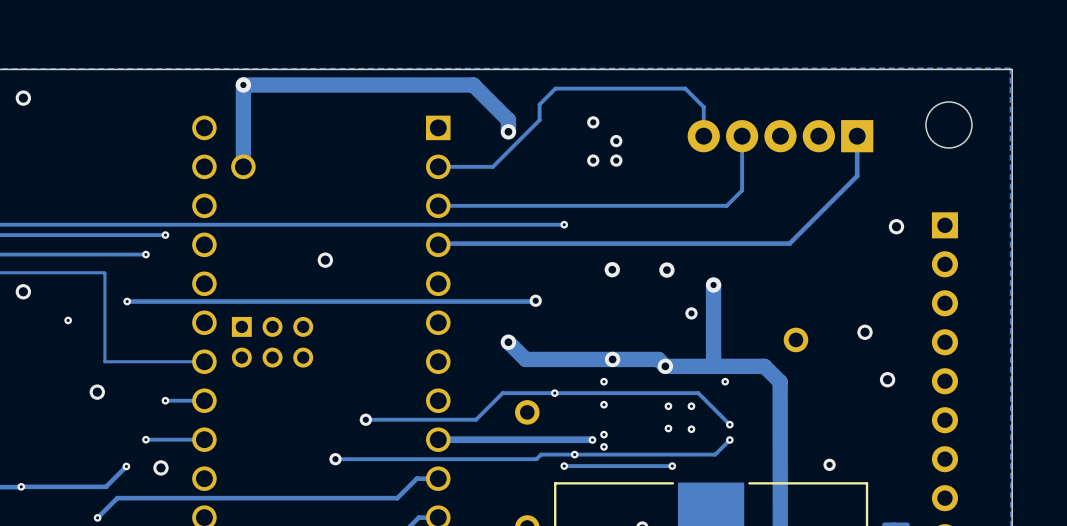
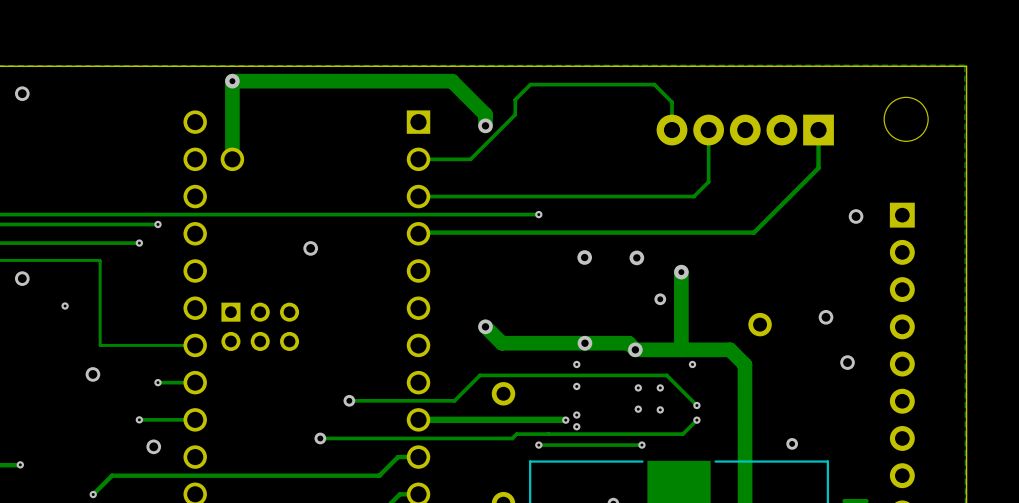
via: (593, 122) -> none
via: (616, 141) -> none
via: (593, 160) -> none
via: (616, 160) -> none
track: (535, 300) (127, 301) -> none
via: (535, 300) -> none
via: (127, 301) -> none
via: (554, 393) -> none
via: (574, 454) -> none
track: (126, 466) (106, 486) (21, 486) -> none
via: (126, 466) -> none

